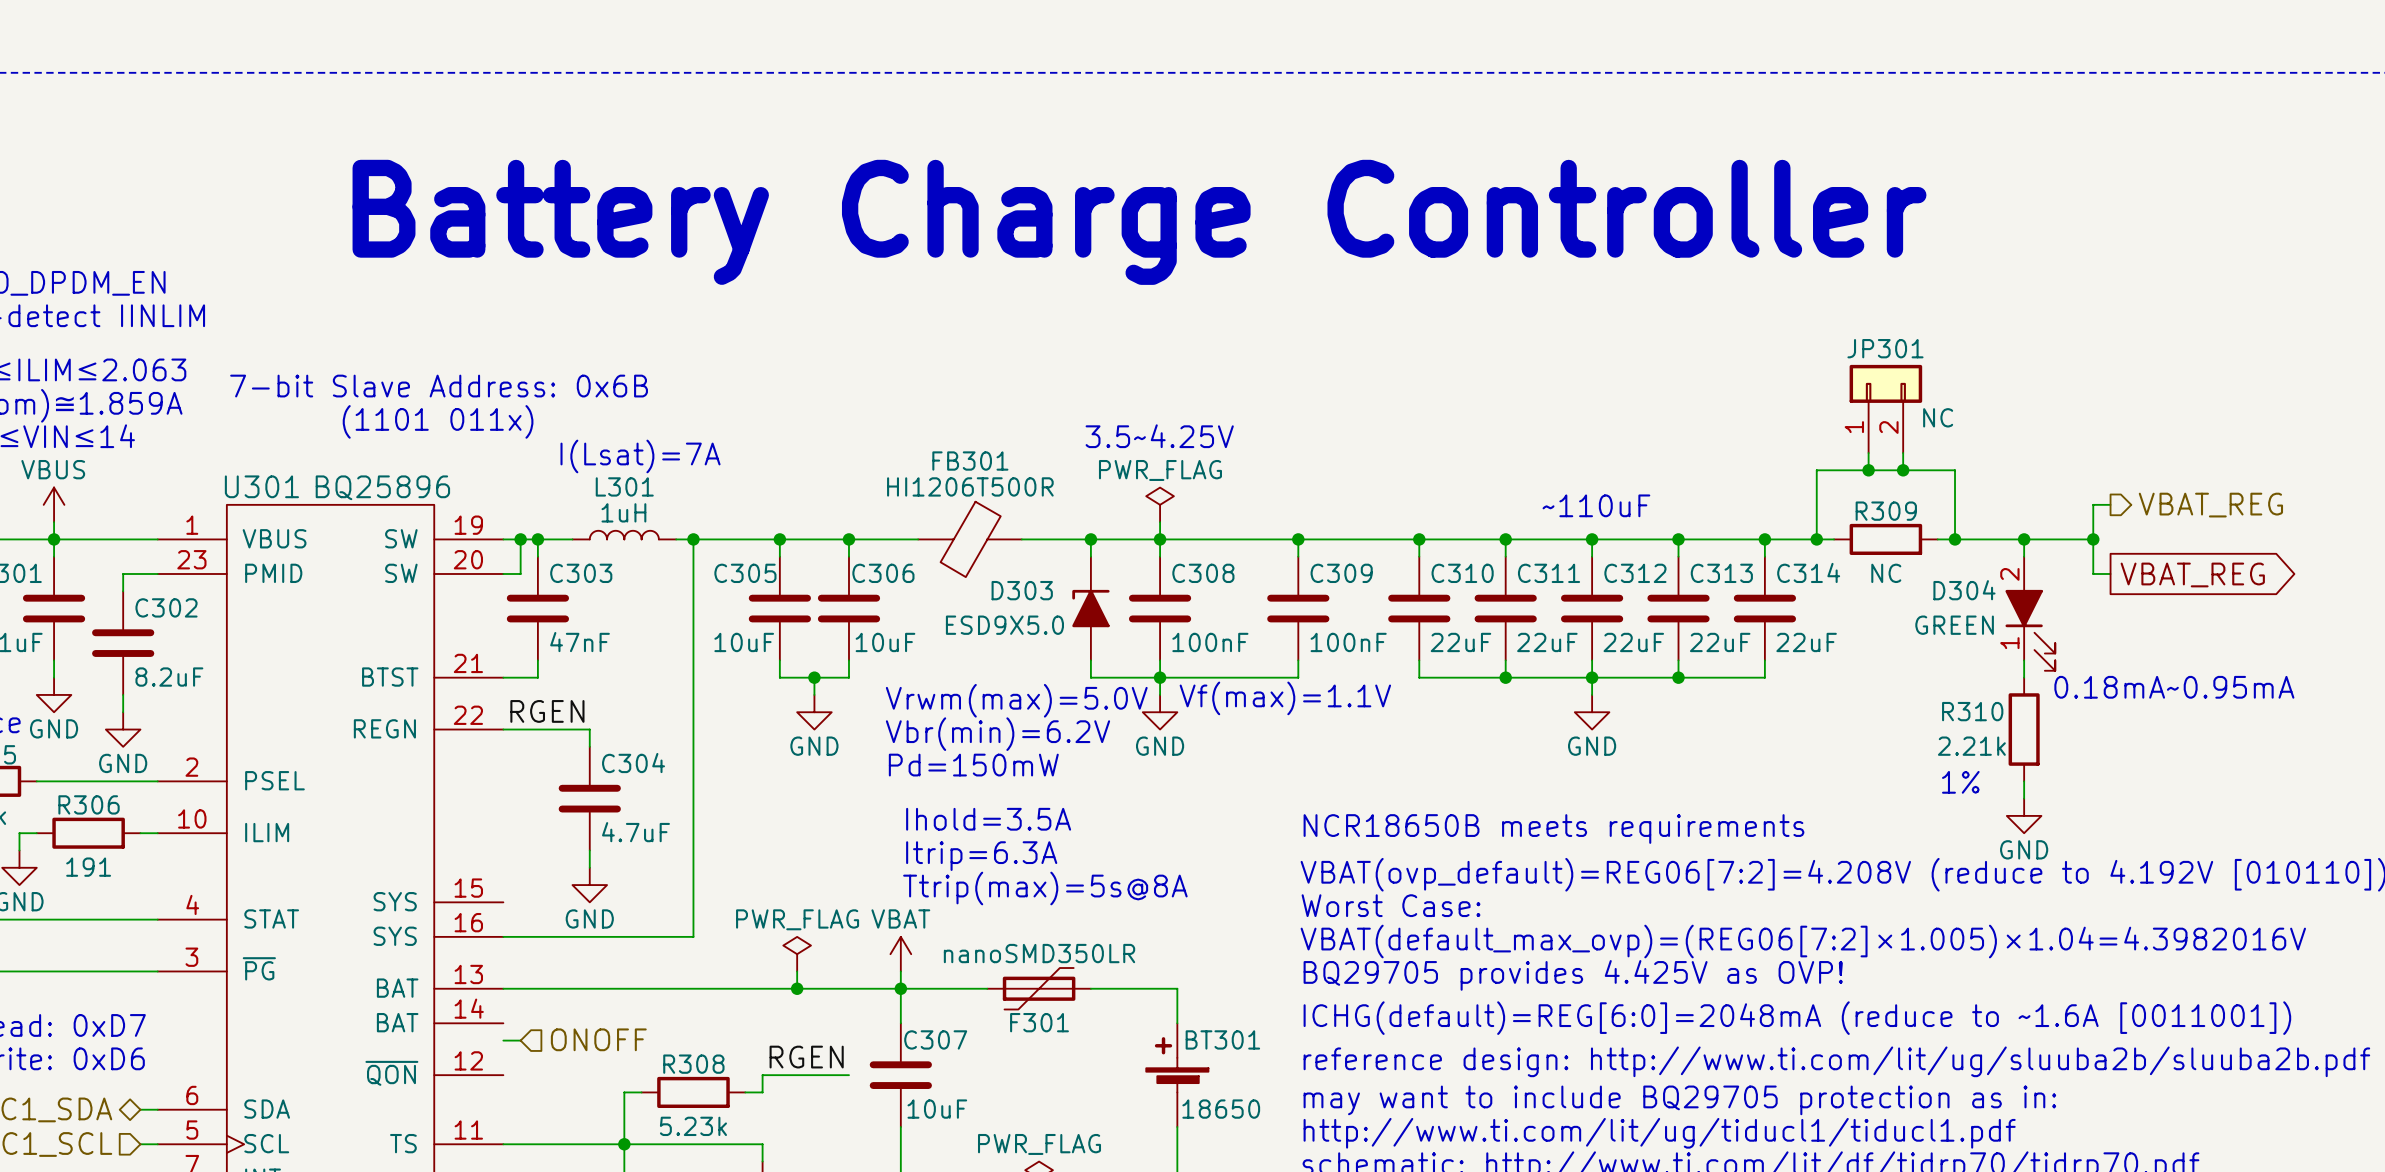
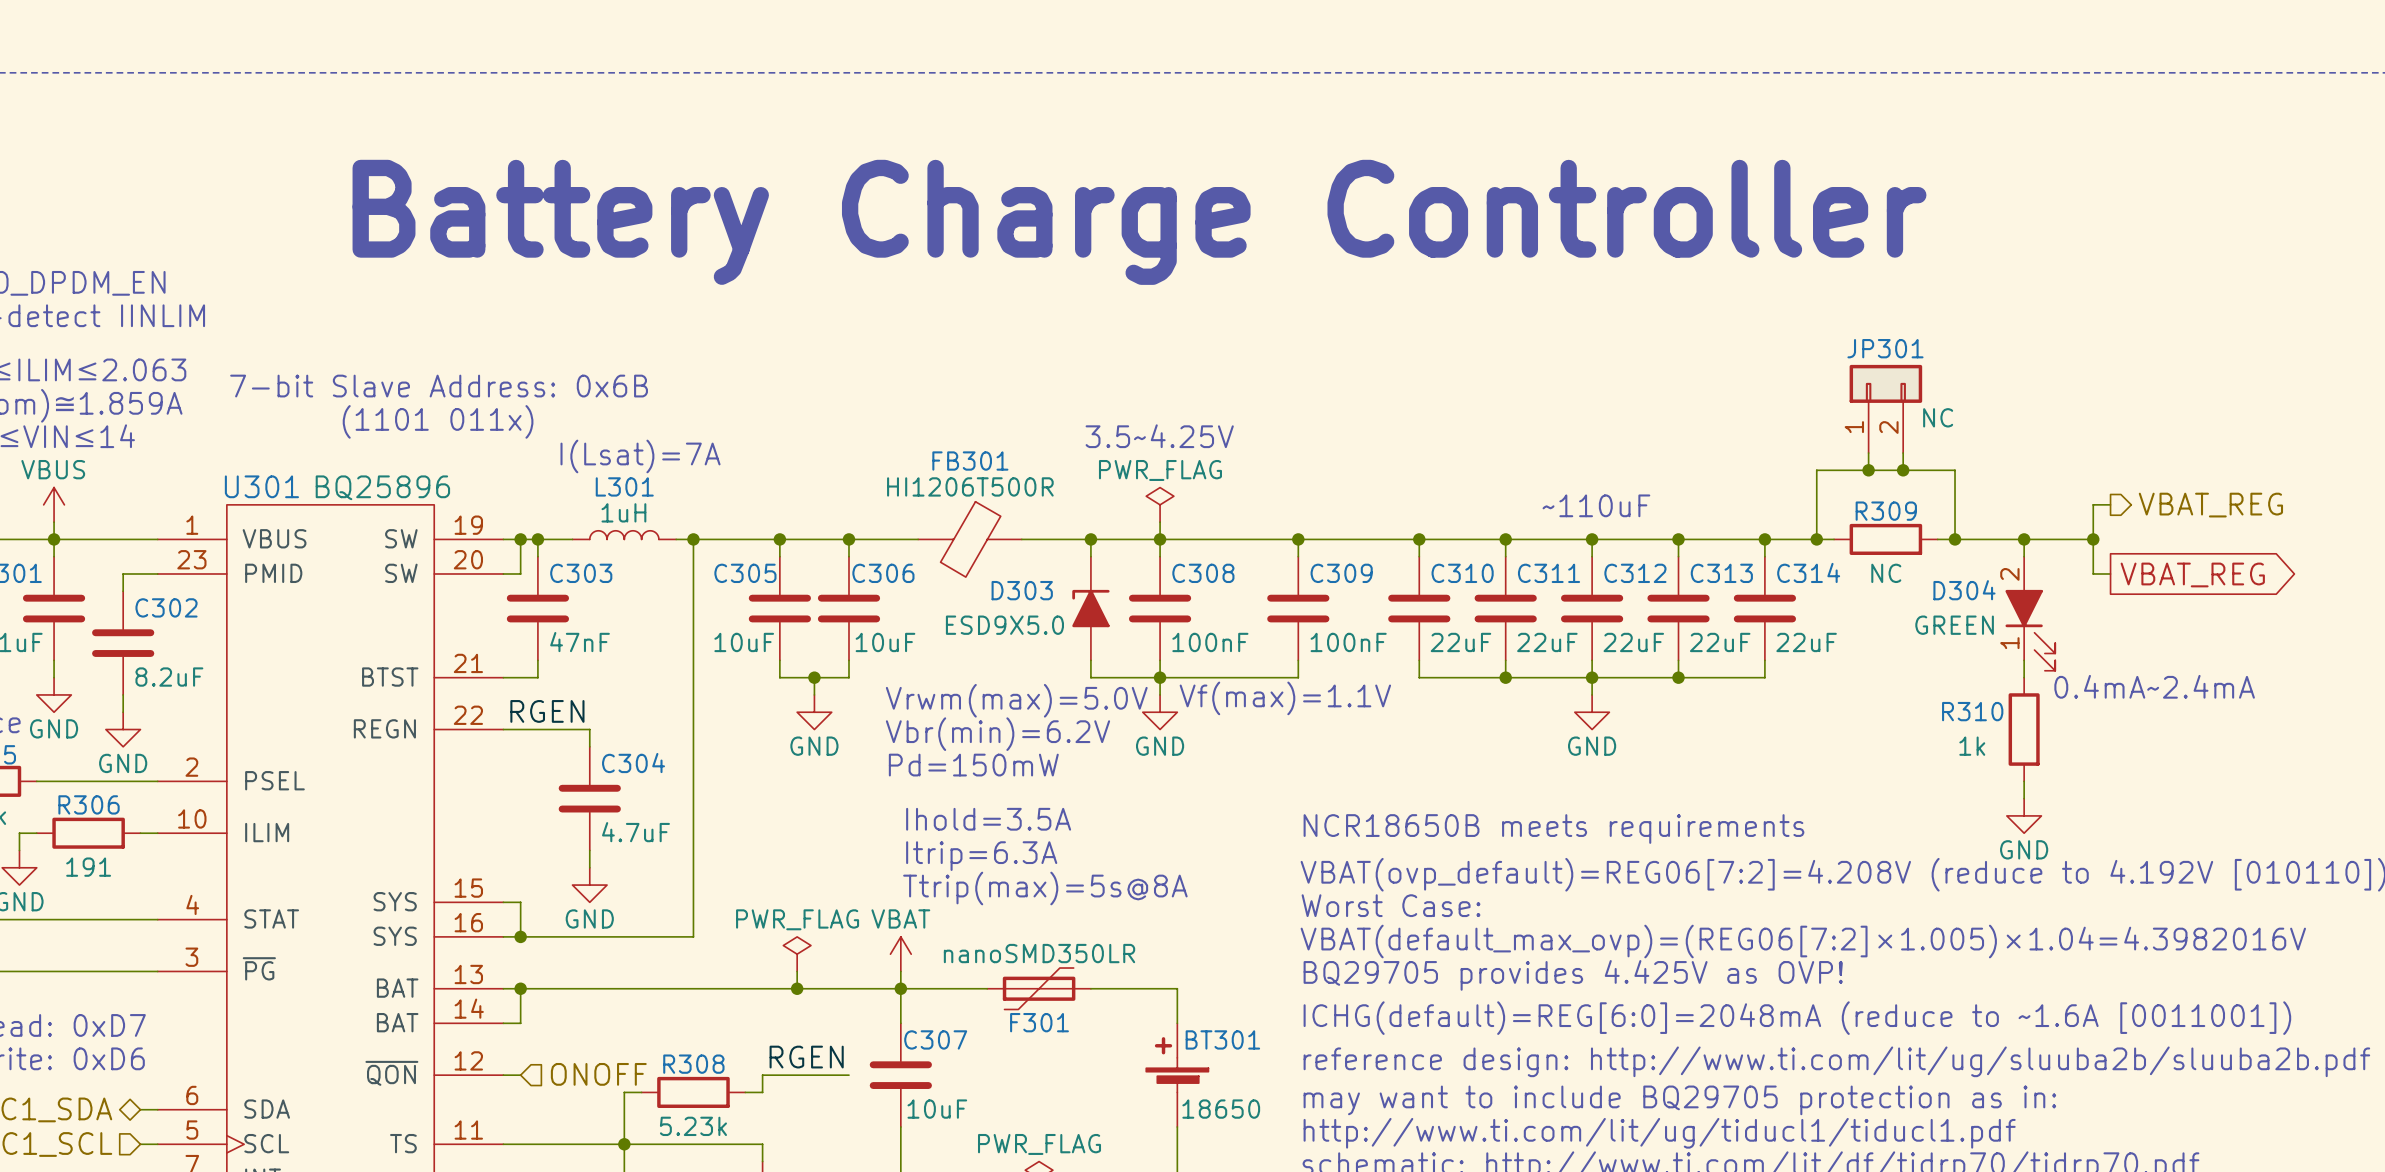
text: 0.18mA~0.95mA (2174, 687) -> 0.4mA~2.4mA (2154, 686)
R310 value: 2.21k (1971, 746) -> 1k (1972, 746)
text: 1% (1960, 782) -> none
wire: none -> (503, 902) (520, 902) (520, 936)
junction: none -> (520, 936)
wire: none -> (520, 988) (520, 1023) (503, 1023)
junction: none -> (520, 988)
hierarchical label position: ONOFF (598, 1039) -> ONOFF (598, 1074)
wire: (503, 1040) (520, 1040) -> (503, 1075) (520, 1075)

